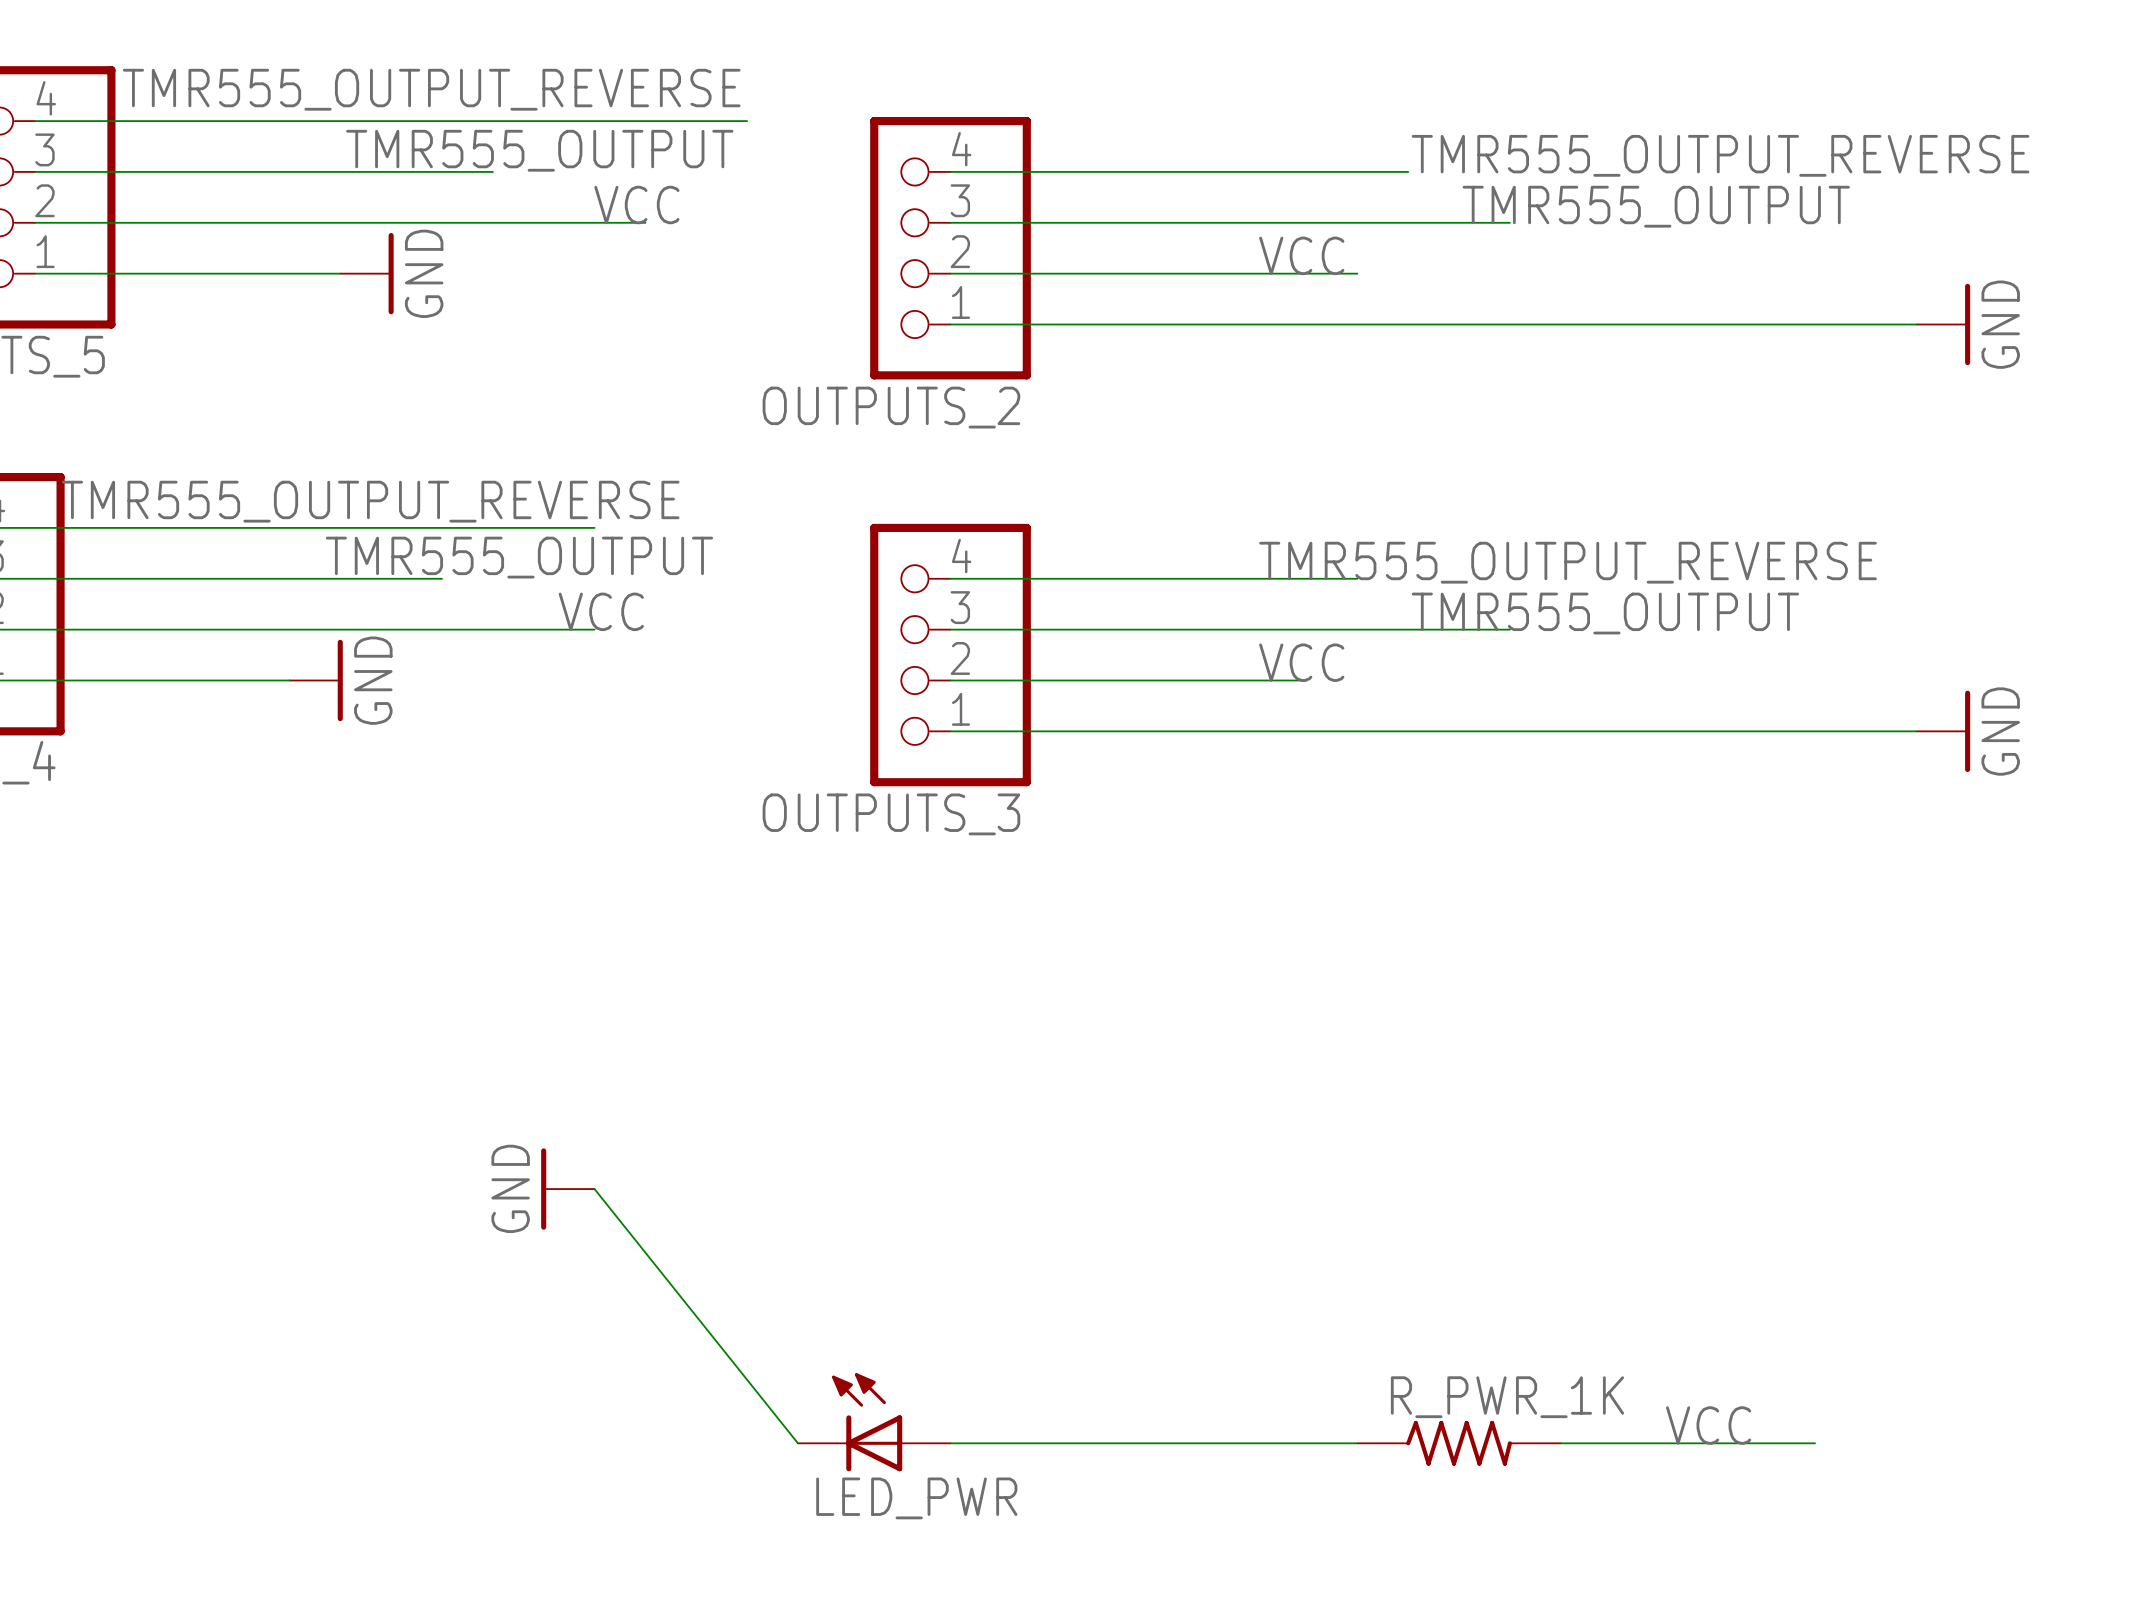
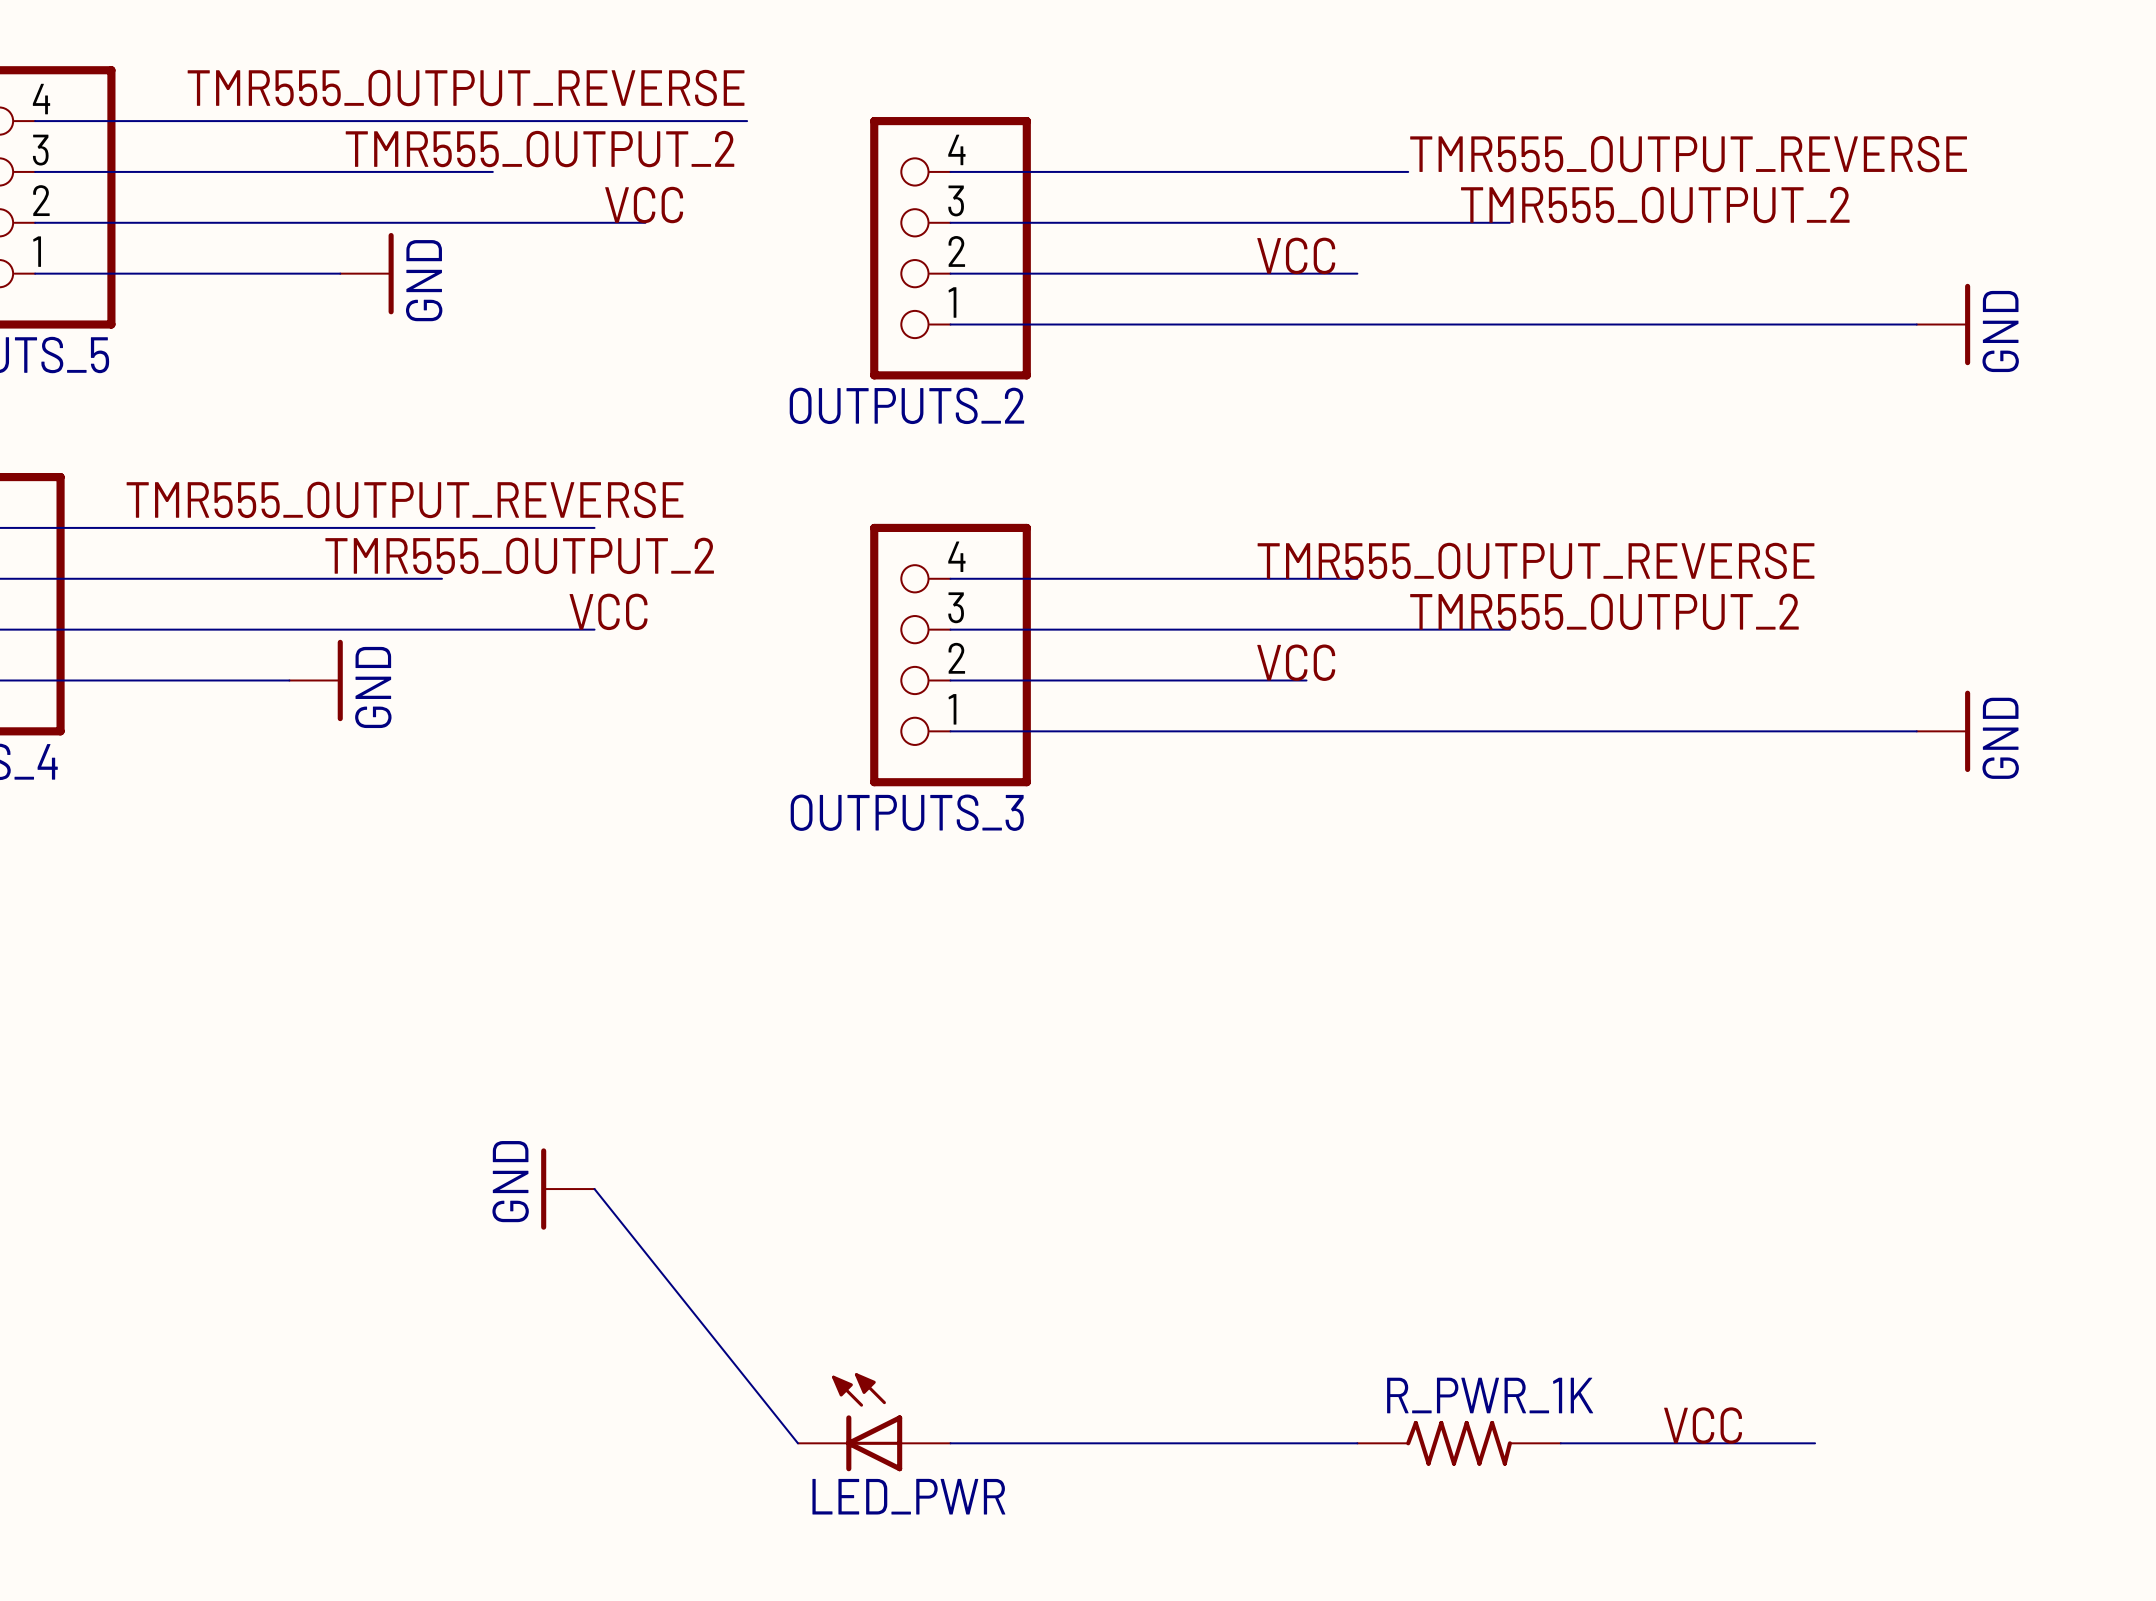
label: TMR555_OUTPUT (539, 150) -> TMR555_OUTPUT_2 (540, 149)
label: TMR555_OUTPUT (1656, 206) -> TMR555_OUTPUT_2 (1655, 204)
label: TMR555_OUTPUT (519, 557) -> TMR555_OUTPUT_2 (519, 555)
label: TMR555_OUTPUT (1605, 613) -> TMR555_OUTPUT_2 (1604, 611)

